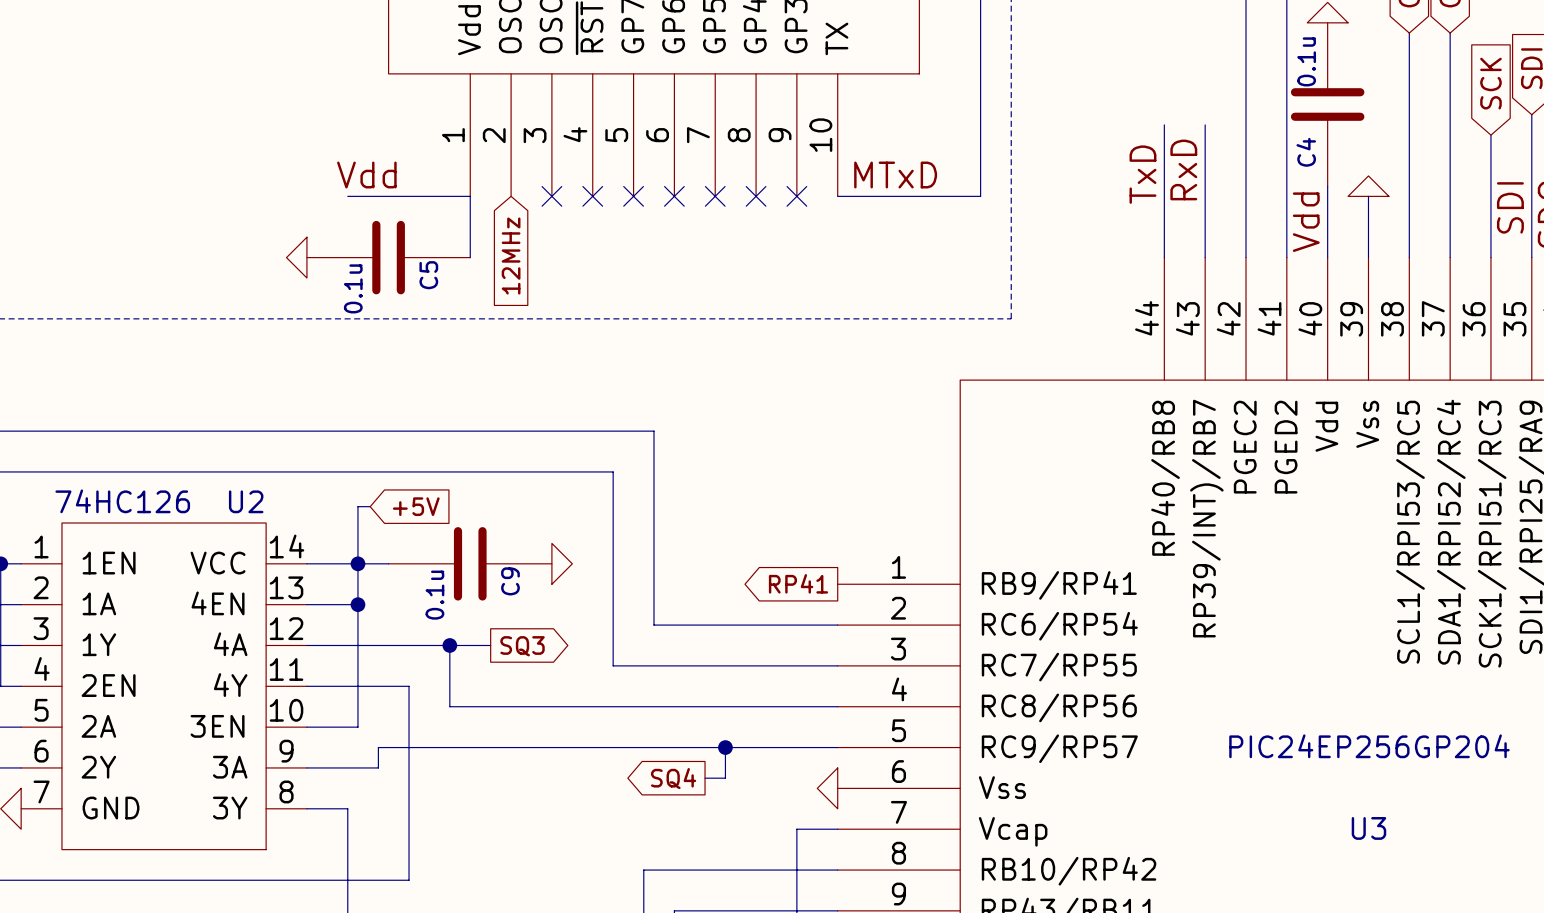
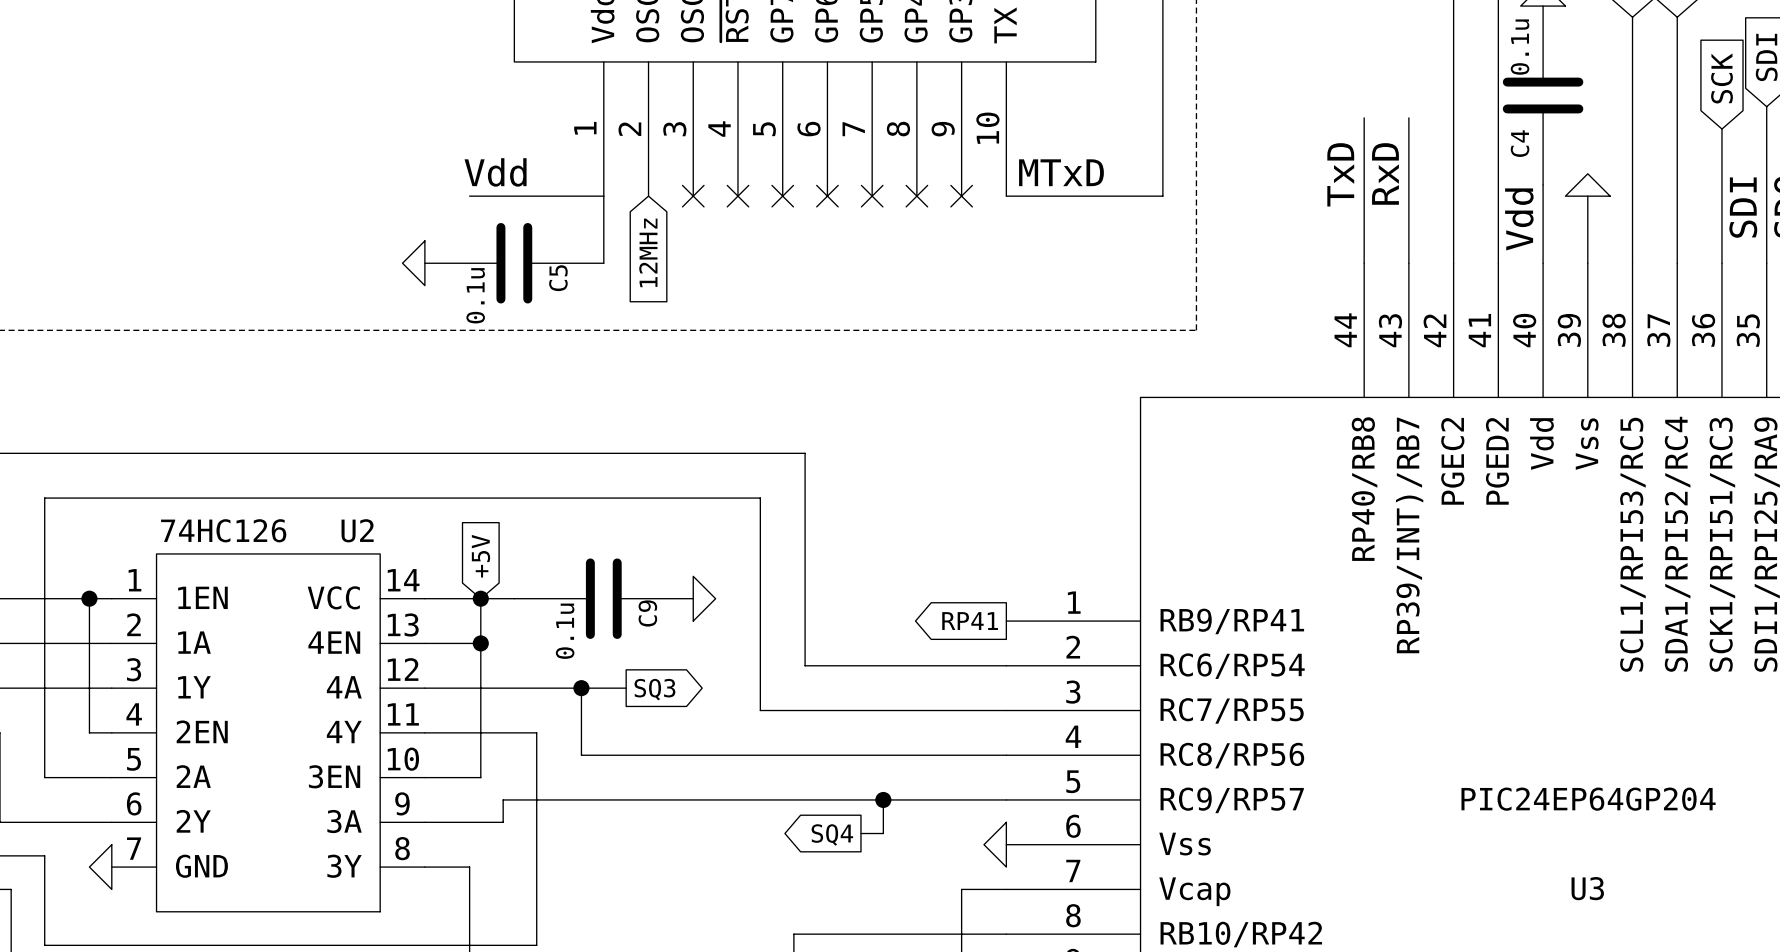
wire: (370, 506) (357, 506) (357, 563) -> none
global label rotation: 0° (416, 506) -> 90° counterclockwise (480, 556)
U3 value: PIC24EP256GP204 (1369, 746) -> PIC24EP64GP204 (1588, 799)

